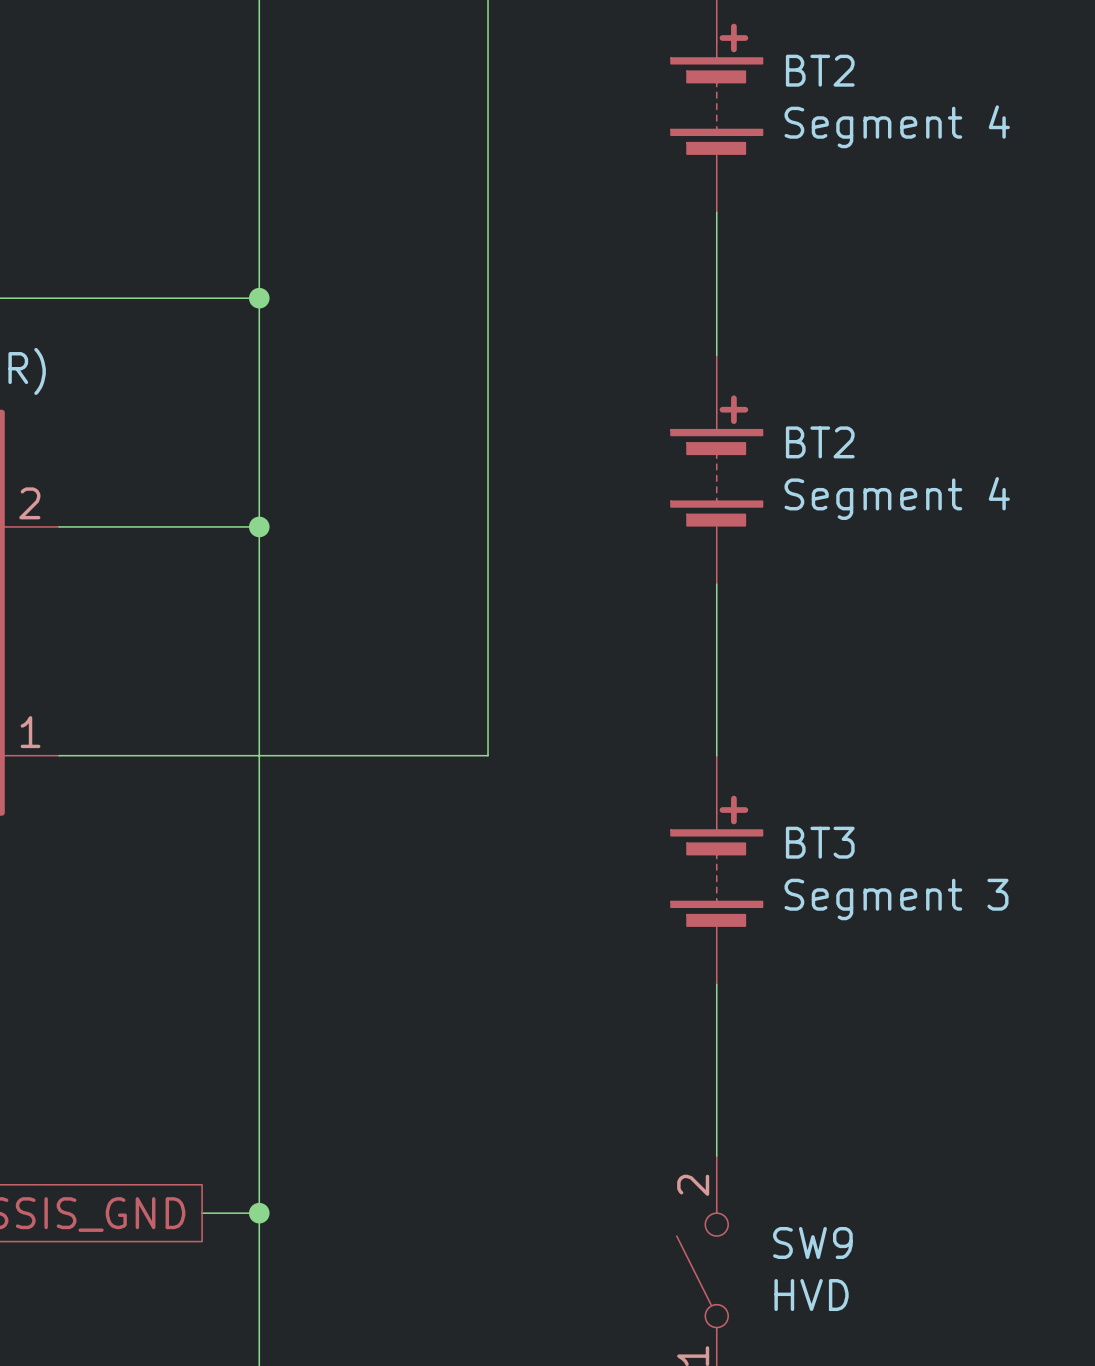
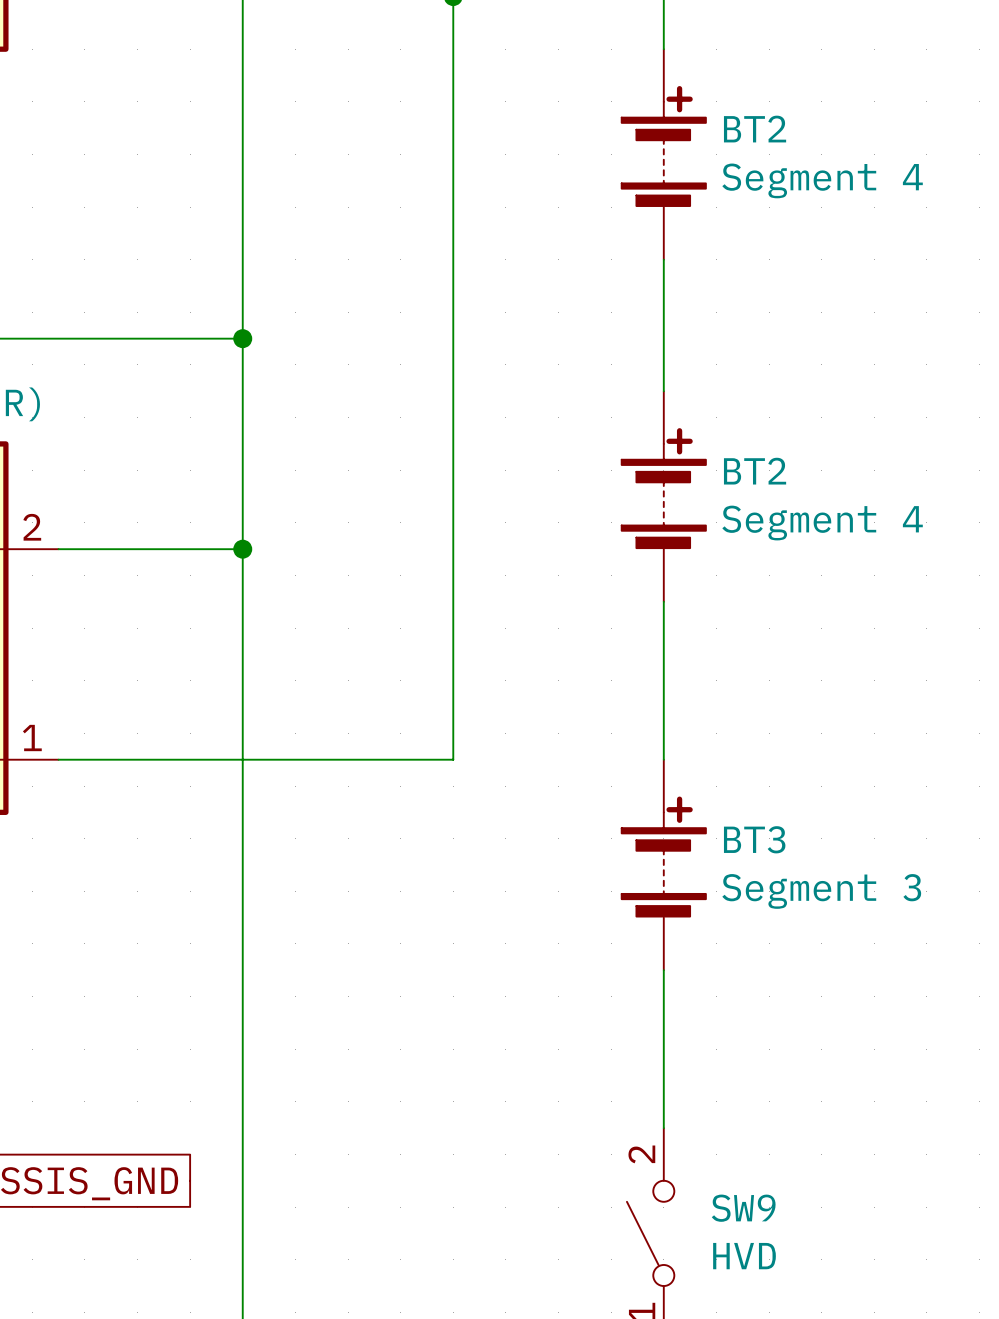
wire: (202, 1213) (259, 1213) -> none
junction: (259, 1213) -> none

